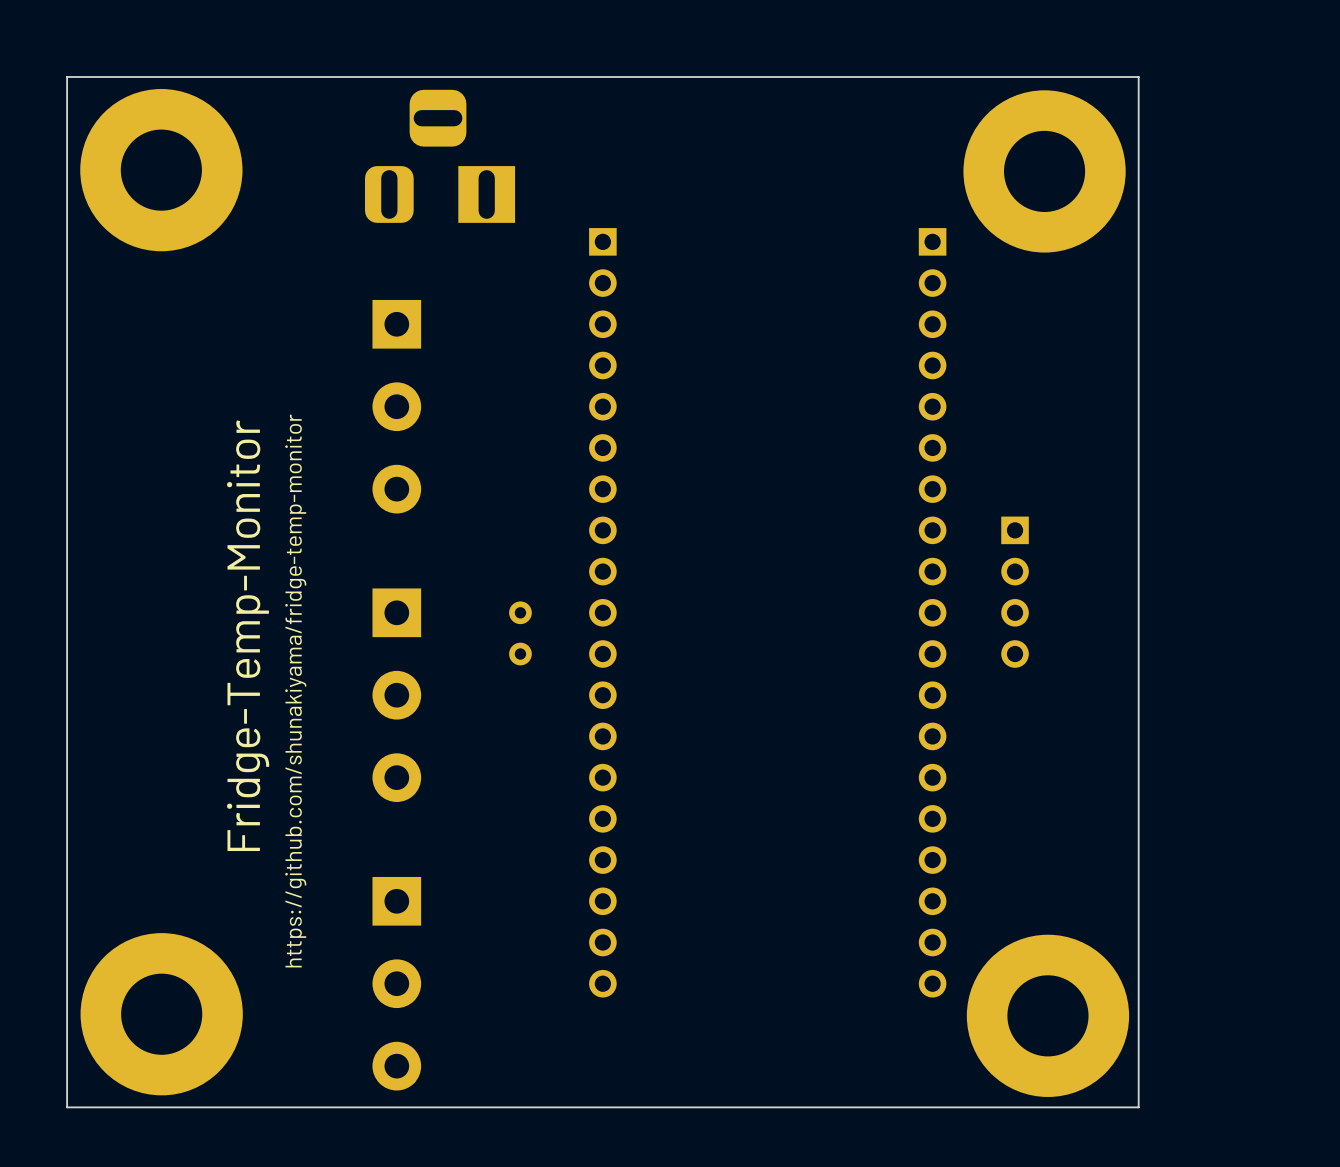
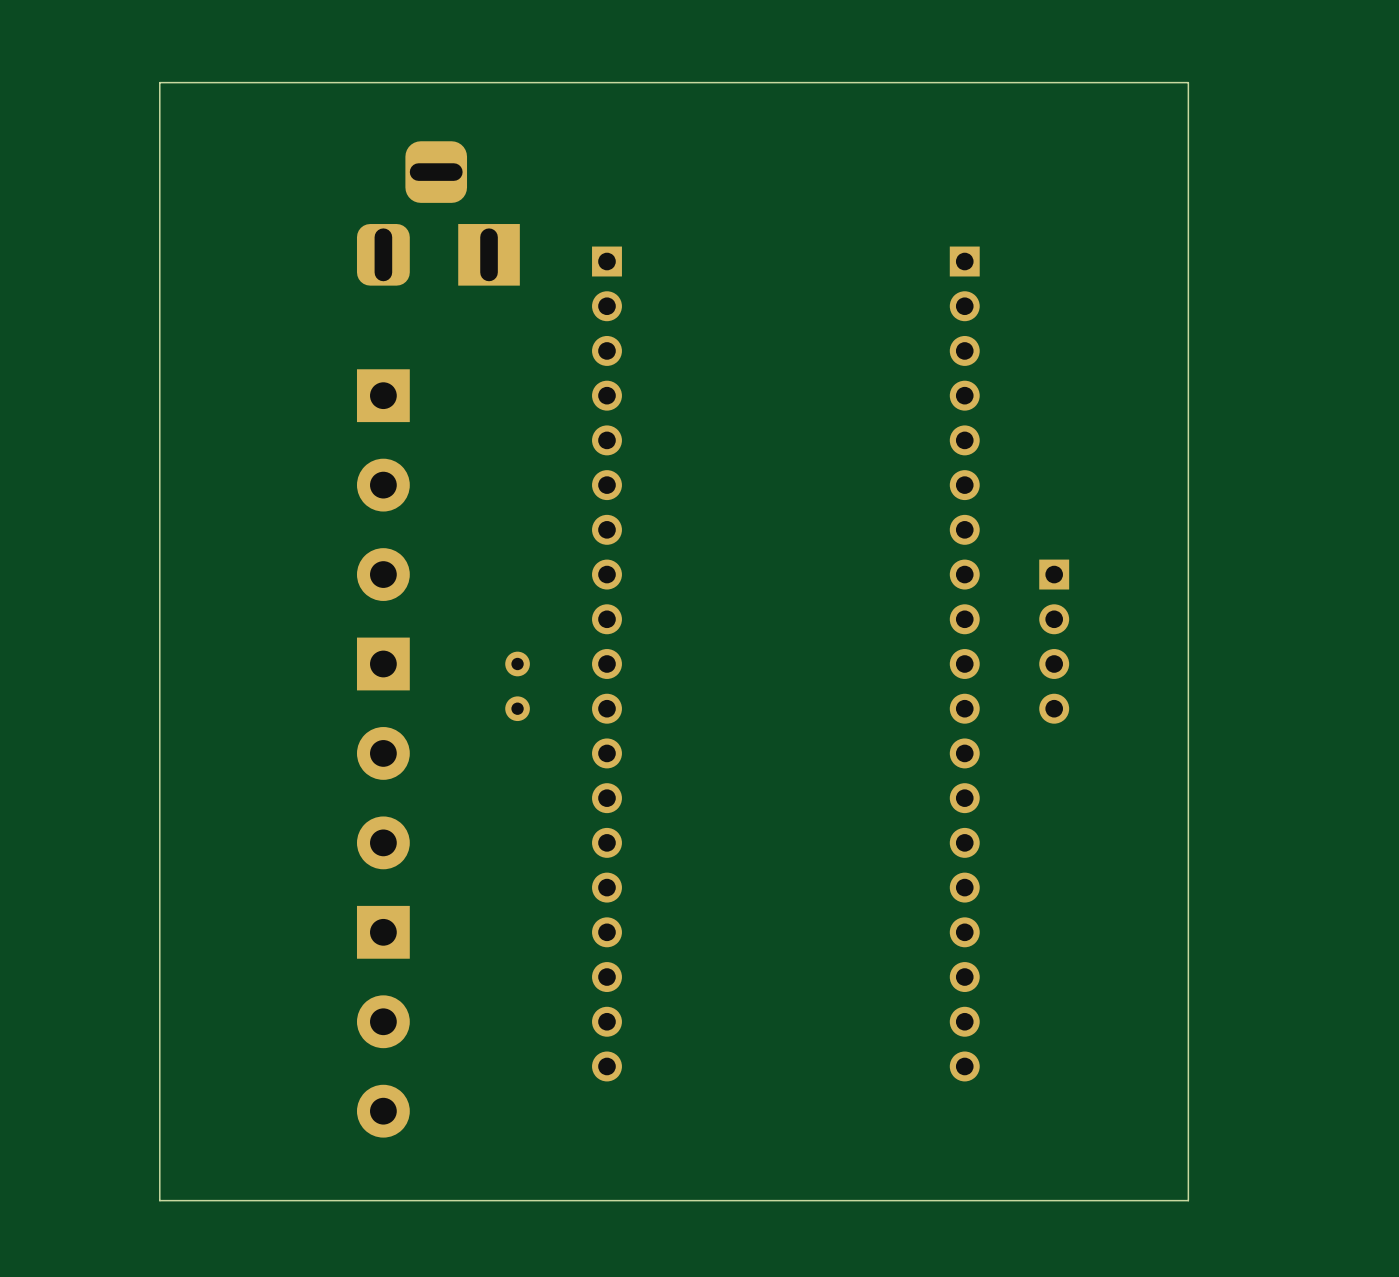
board edge: (190, 77) (67, 77) (67, 1107) (190, 1107) -> (159, 82) (159, 1200)
part position: (440, 156) -> (438, 213)
part: (161, 170) -> none
part: (1044, 171) -> none
part position: (396, 406) -> (383, 485)
text: Fridge-Temp-Monitor (248, 635) -> none
text: https://github.com/shunakiyama/fridge-temp-monitor (295, 690) -> none
part position: (396, 983) -> (383, 1021)
part: (161, 1014) -> none
part: (1047, 1015) -> none

